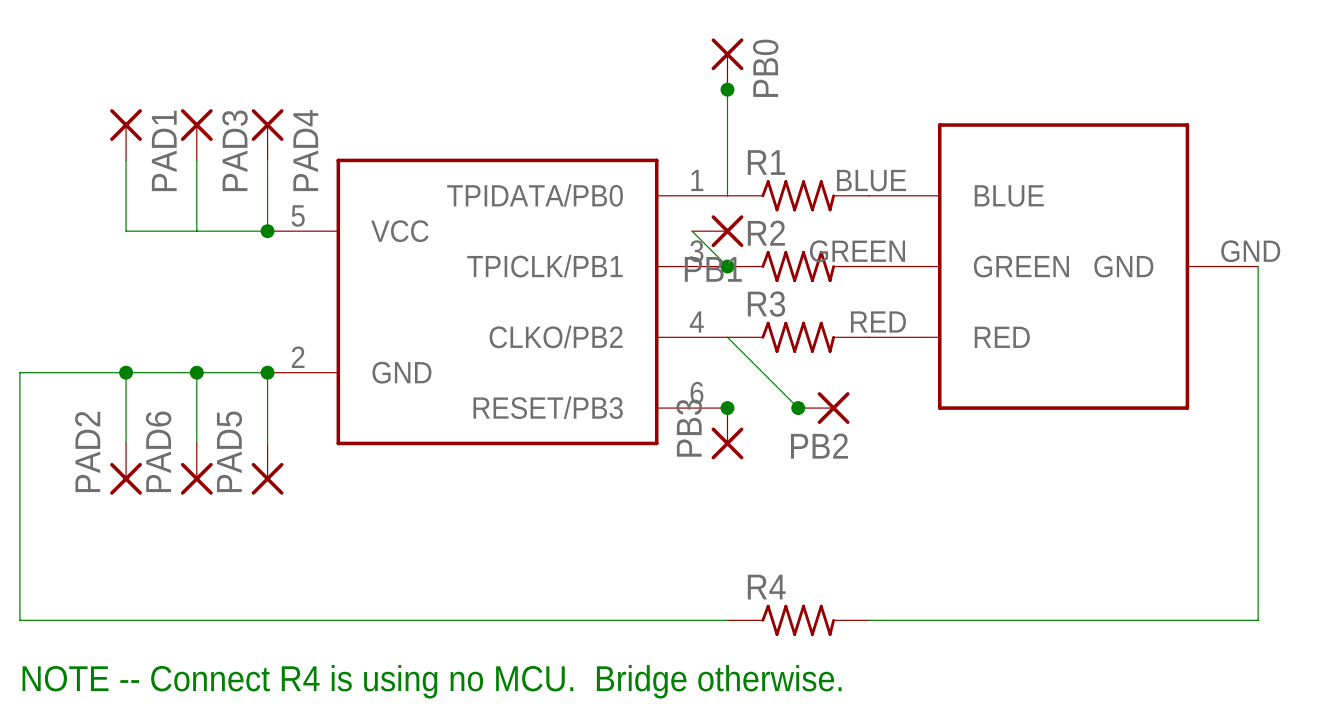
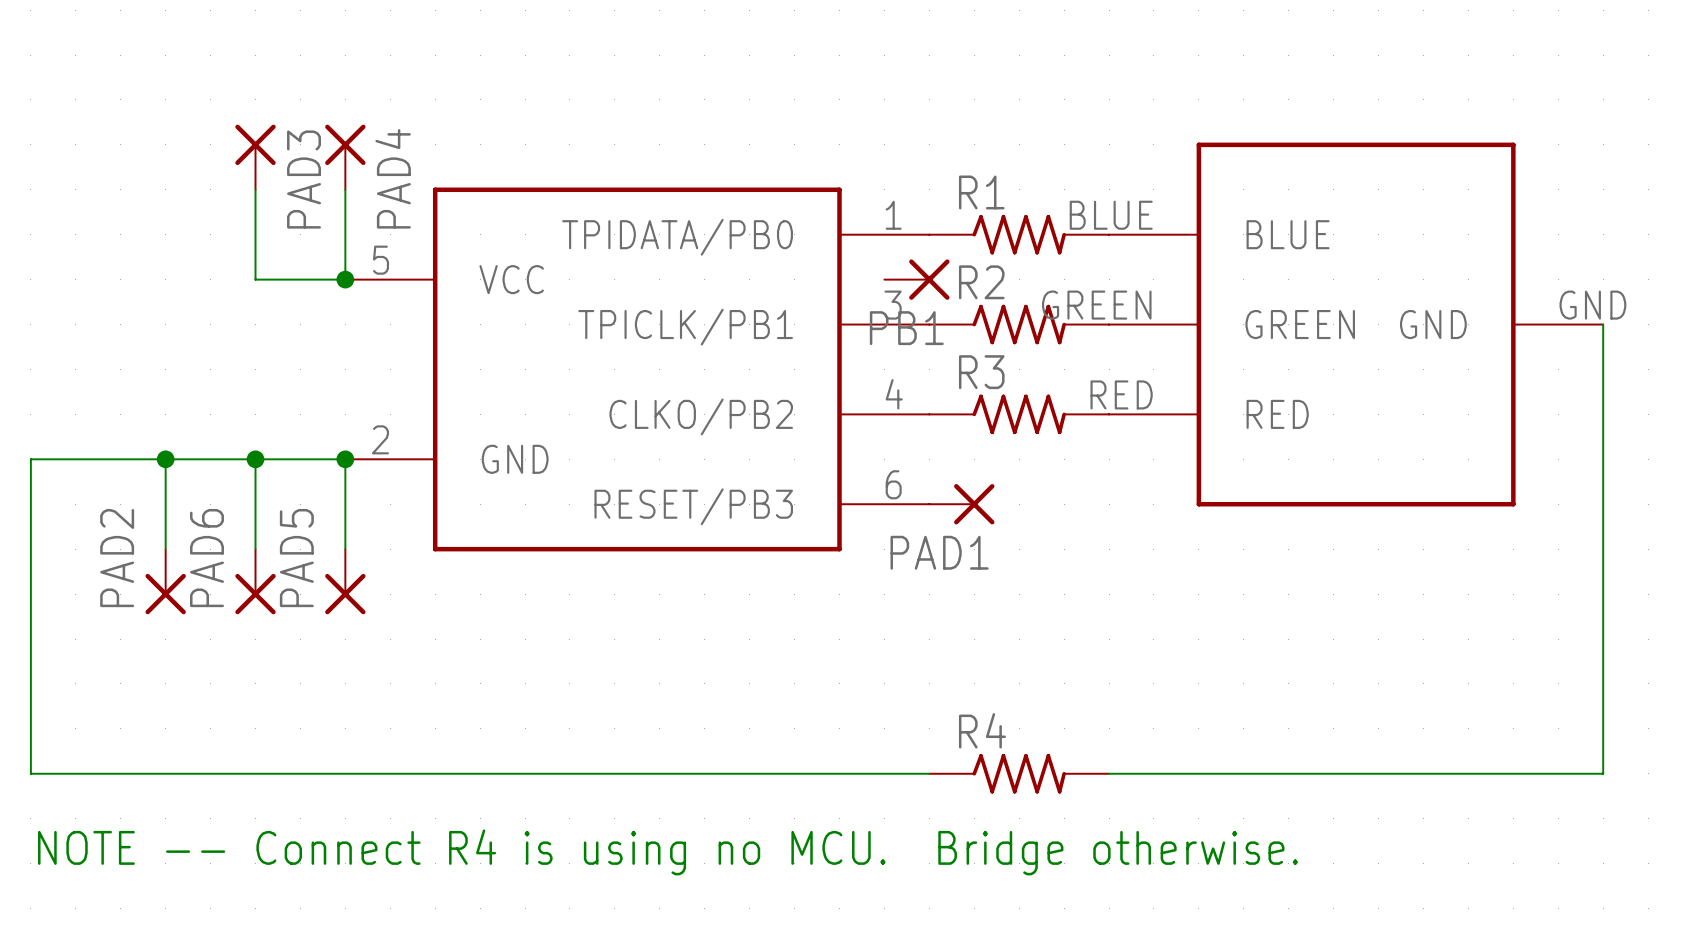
PB0: (727, 64) -> none
wire: (727, 89) (727, 195) -> none
junction: (727, 89) -> none
PAD1 rotation: 0° (126, 125) -> 90° clockwise (974, 504)
PAD1 position: (126, 134) -> (961, 504)
wire: (126, 160) (126, 231) (196, 231) -> none
wire: (692, 231) (727, 266) -> none
junction: (727, 266) -> none
wire: (727, 337) (798, 408) -> none
junction: (727, 408) -> none
junction: (798, 408) -> none
PB2: (823, 408) -> none
PB3: (727, 433) -> none

